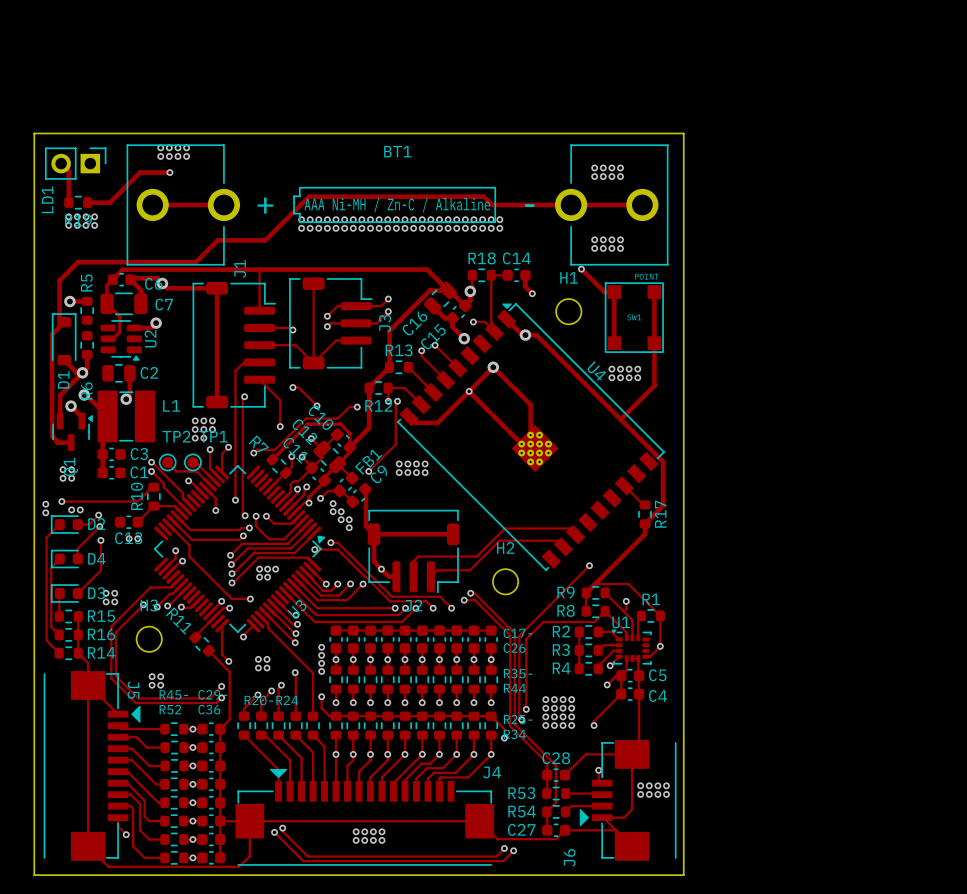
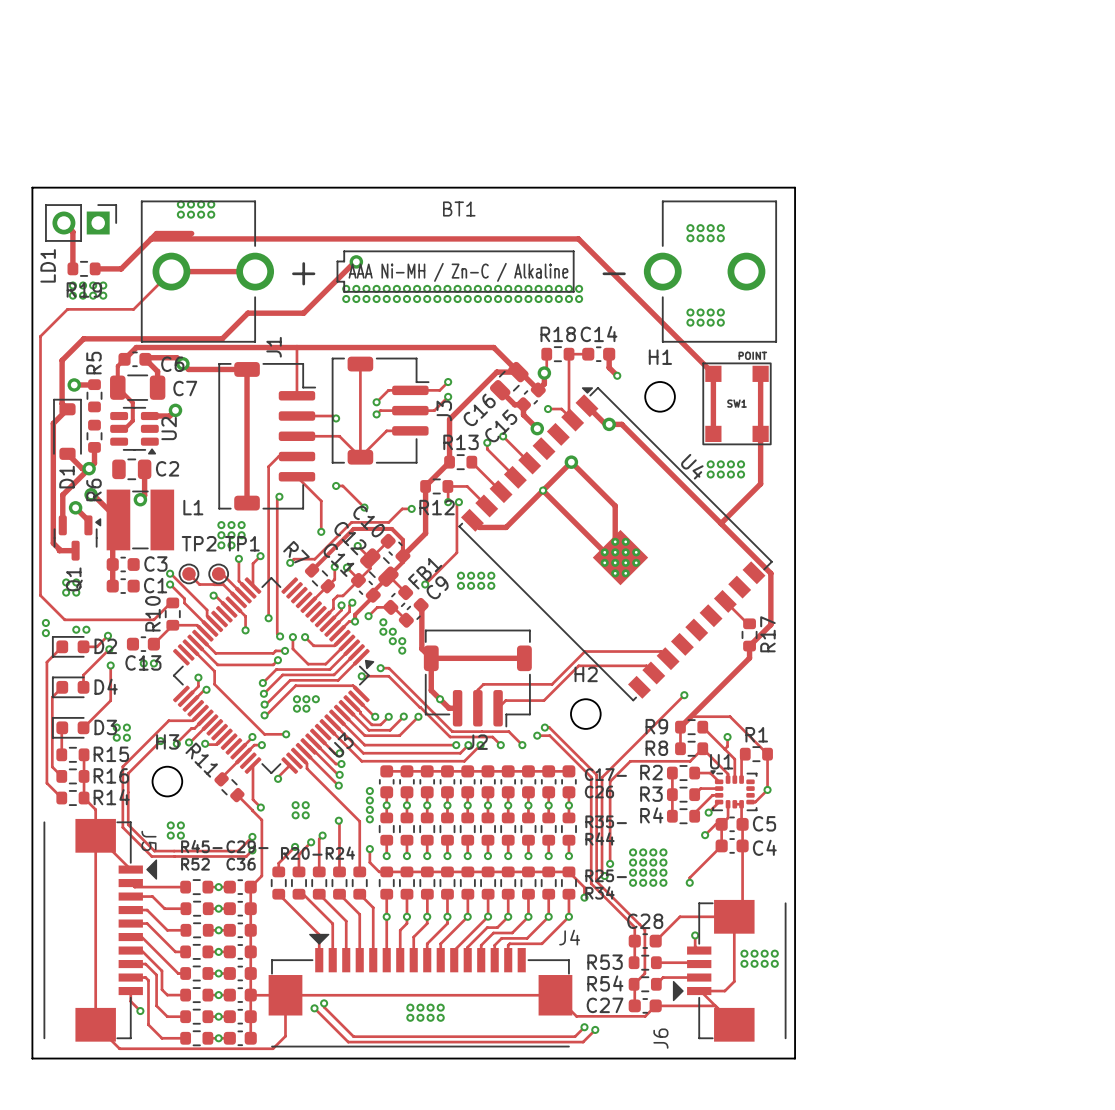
via: (169, 172) -> none
track: (310, 196) (483, 196) (492, 204) (642, 204) -> none
via: none -> (356, 261)
track: none -> (171, 271) (133, 309) (67, 309) (40, 336) (40, 595) (64, 619)
track: (581, 269) (604, 292) (614, 292) -> (151, 238) (578, 238) (713, 373)
via: (581, 269) -> none
via: (61, 501) -> none

